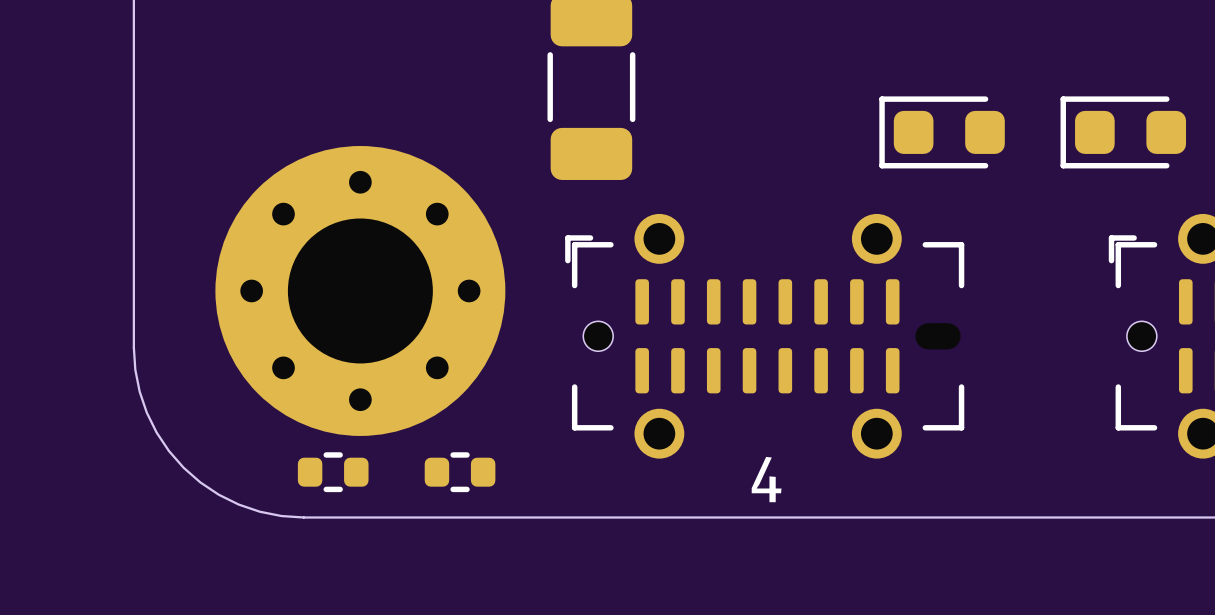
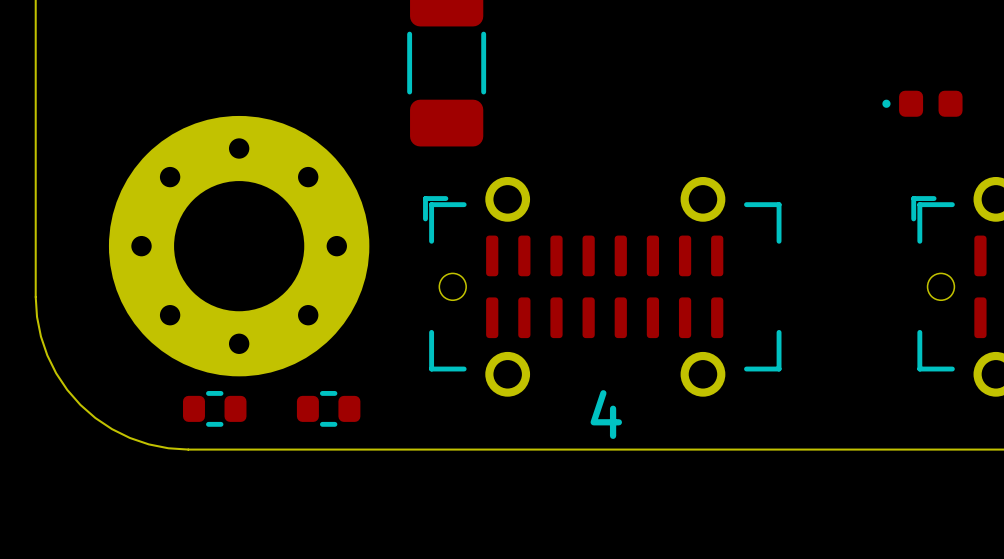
part footprint: [1060, 96, 1187, 169] -> [882, 90, 963, 117]
part: (942, 132) -> none

